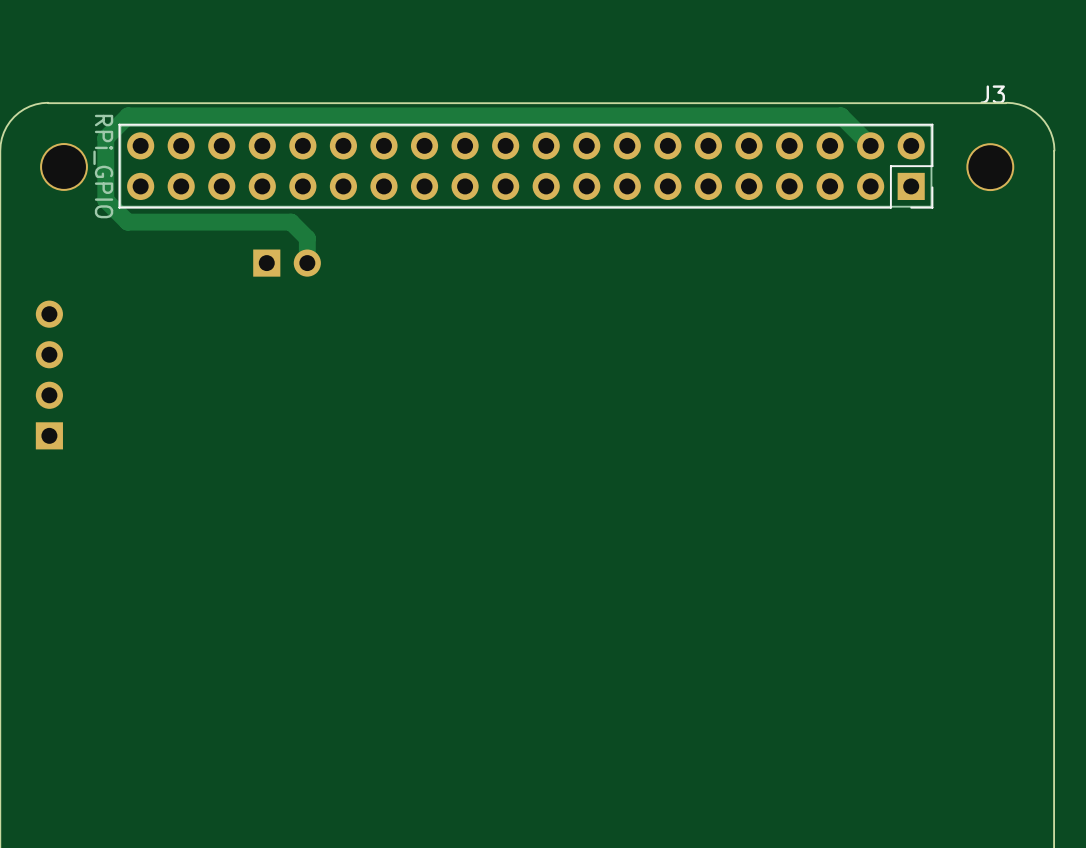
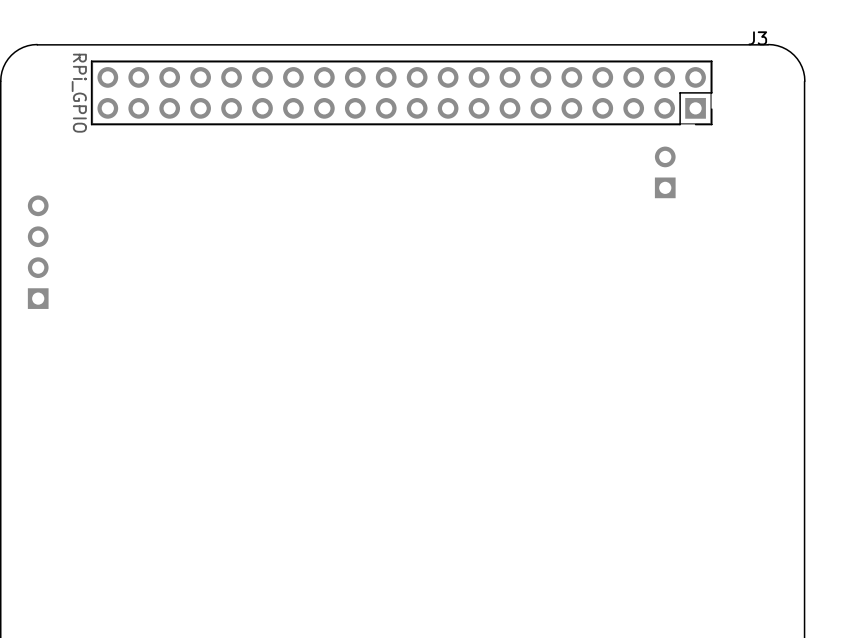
track: (870, 145) (841, 115) (128, 115) (105, 138) (105, 200) (127, 222) (291, 222) (307, 238) (307, 263) -> none
part: (64, 166) -> none
part: (990, 167) -> none
part: (287, 263) -> none
part: none -> (665, 172)

